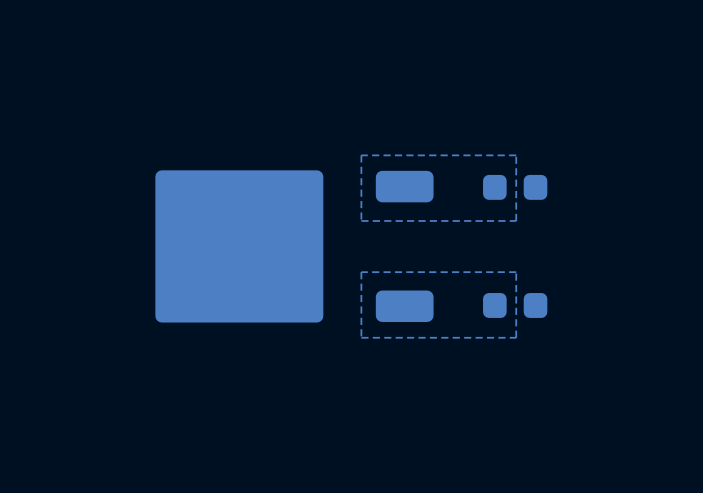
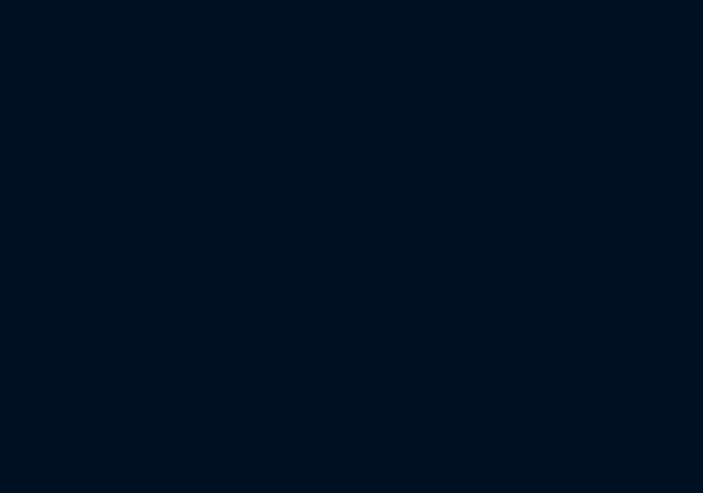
bottom zone outline: (361, 155) (361, 220) (516, 220) (516, 155) (361, 155) -> none
part: (515, 187) -> none
part: (294, 246) -> none
bottom zone outline: (361, 272) (361, 337) (516, 337) (516, 272) (361, 272) -> none
part: (515, 305) -> none

